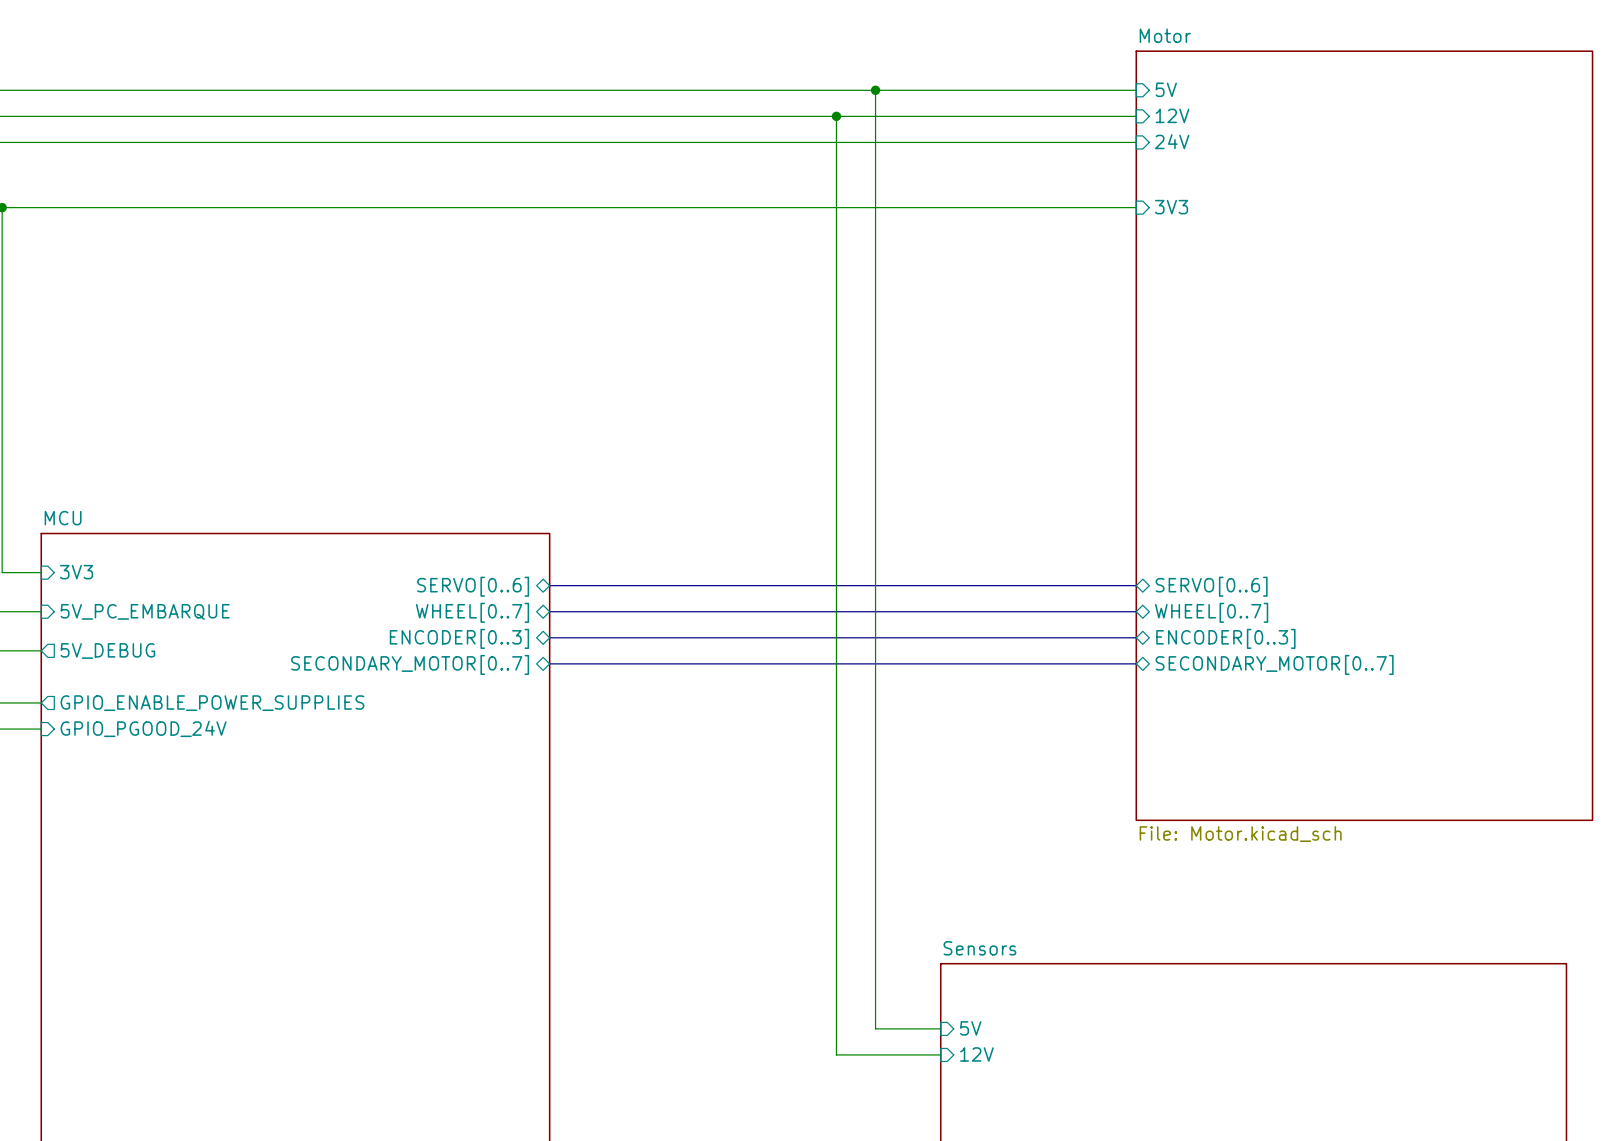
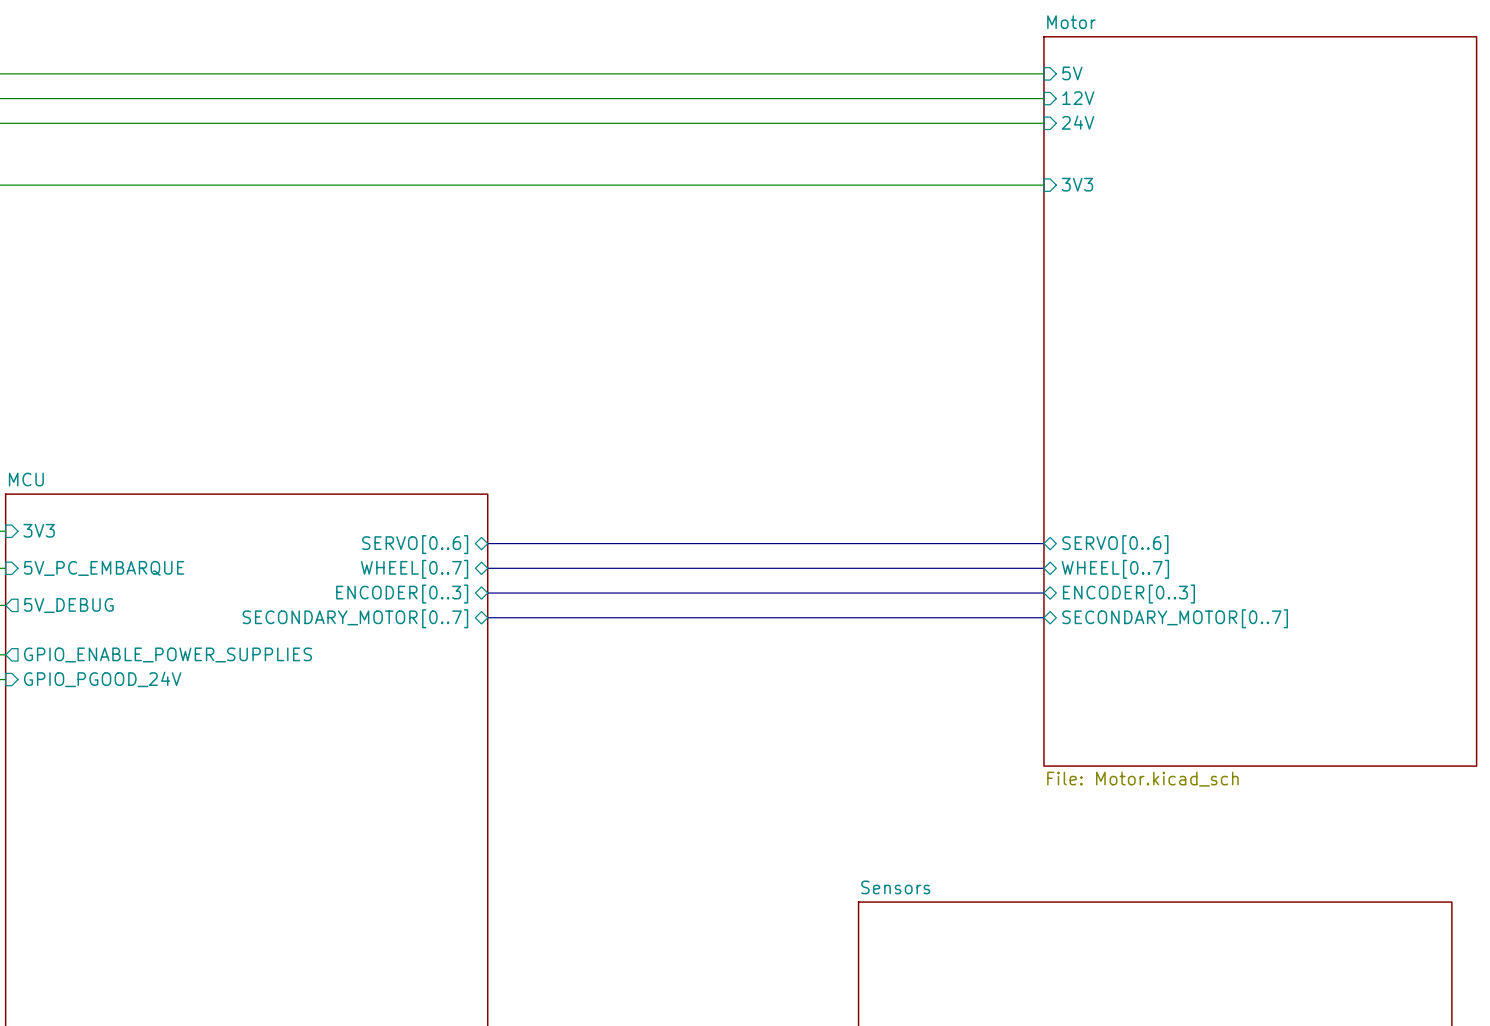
wire: (875, 90) (875, 1028) (940, 1028) -> none
junction: (875, 90) -> none
wire: (836, 116) (836, 1054) (940, 1054) -> none
junction: (836, 116) -> none
sheet pin: 5V (970, 1028) -> none
sheet pin: 12V (976, 1054) -> none

